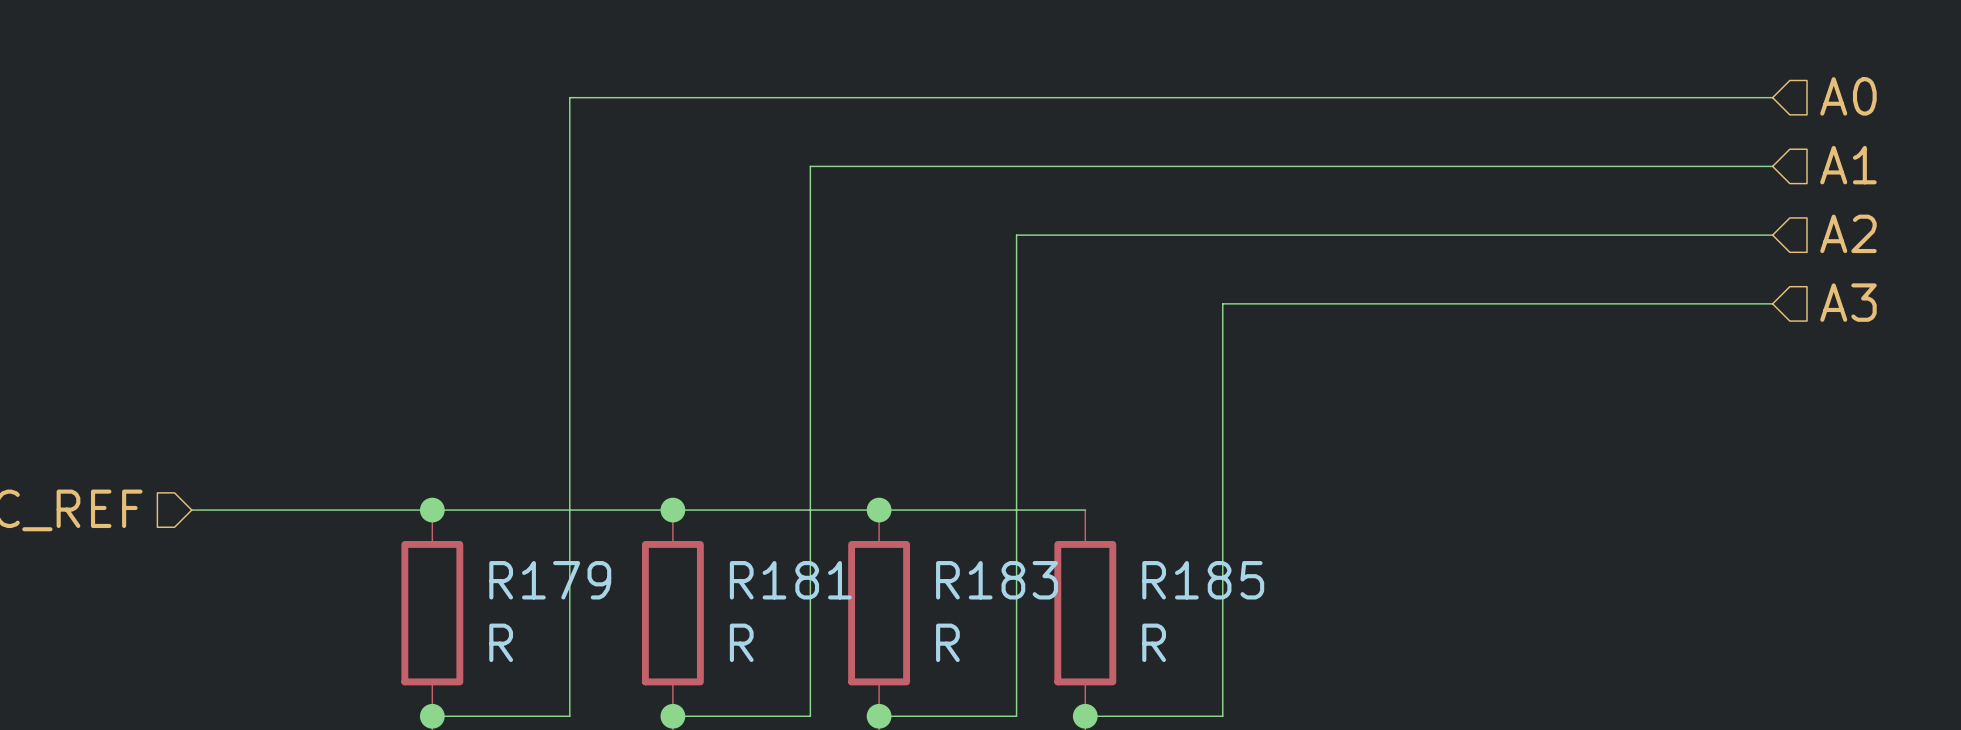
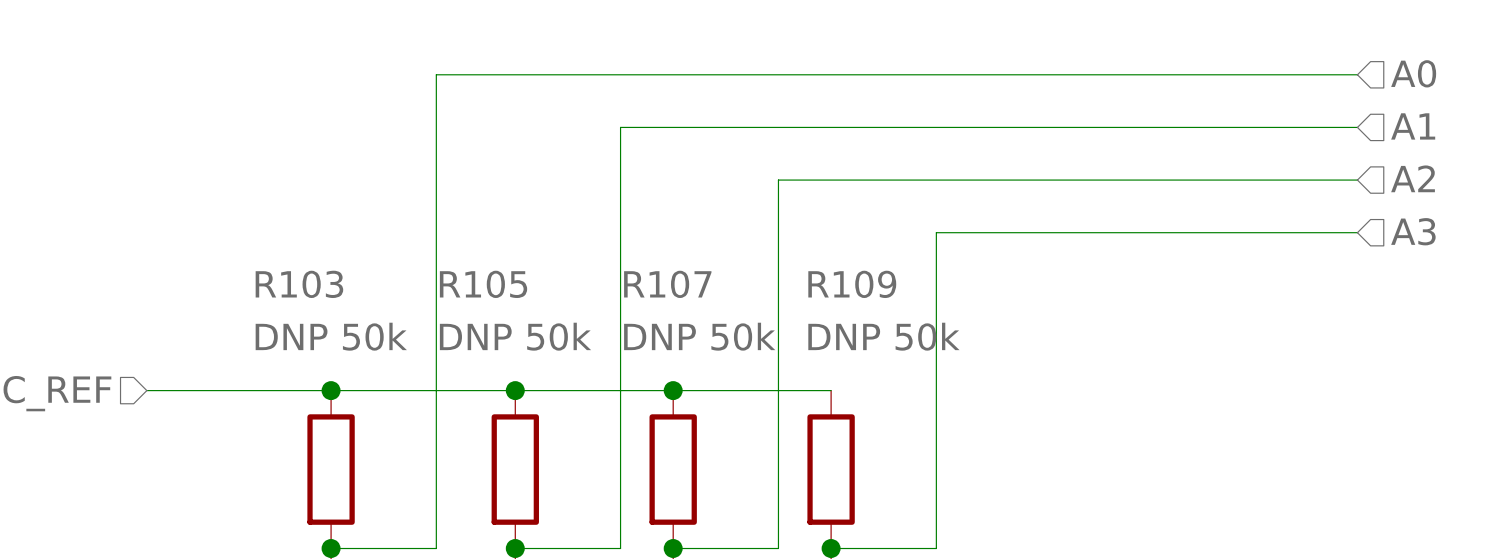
R179 name: R179 (550, 580) -> R103 (299, 284)
R181 name: R181 (790, 580) -> R105 (483, 284)
R183 name: R183 (997, 580) -> R107 (667, 284)
R185 name: R185 (1203, 580) -> R109 (852, 284)
R179 value: R (501, 642) -> DNP 50k (331, 336)
R181 value: R (741, 642) -> DNP 50k (515, 336)
R183 value: R (947, 642) -> DNP 50k (699, 336)
R185 value: R (1154, 642) -> DNP 50k (883, 336)

